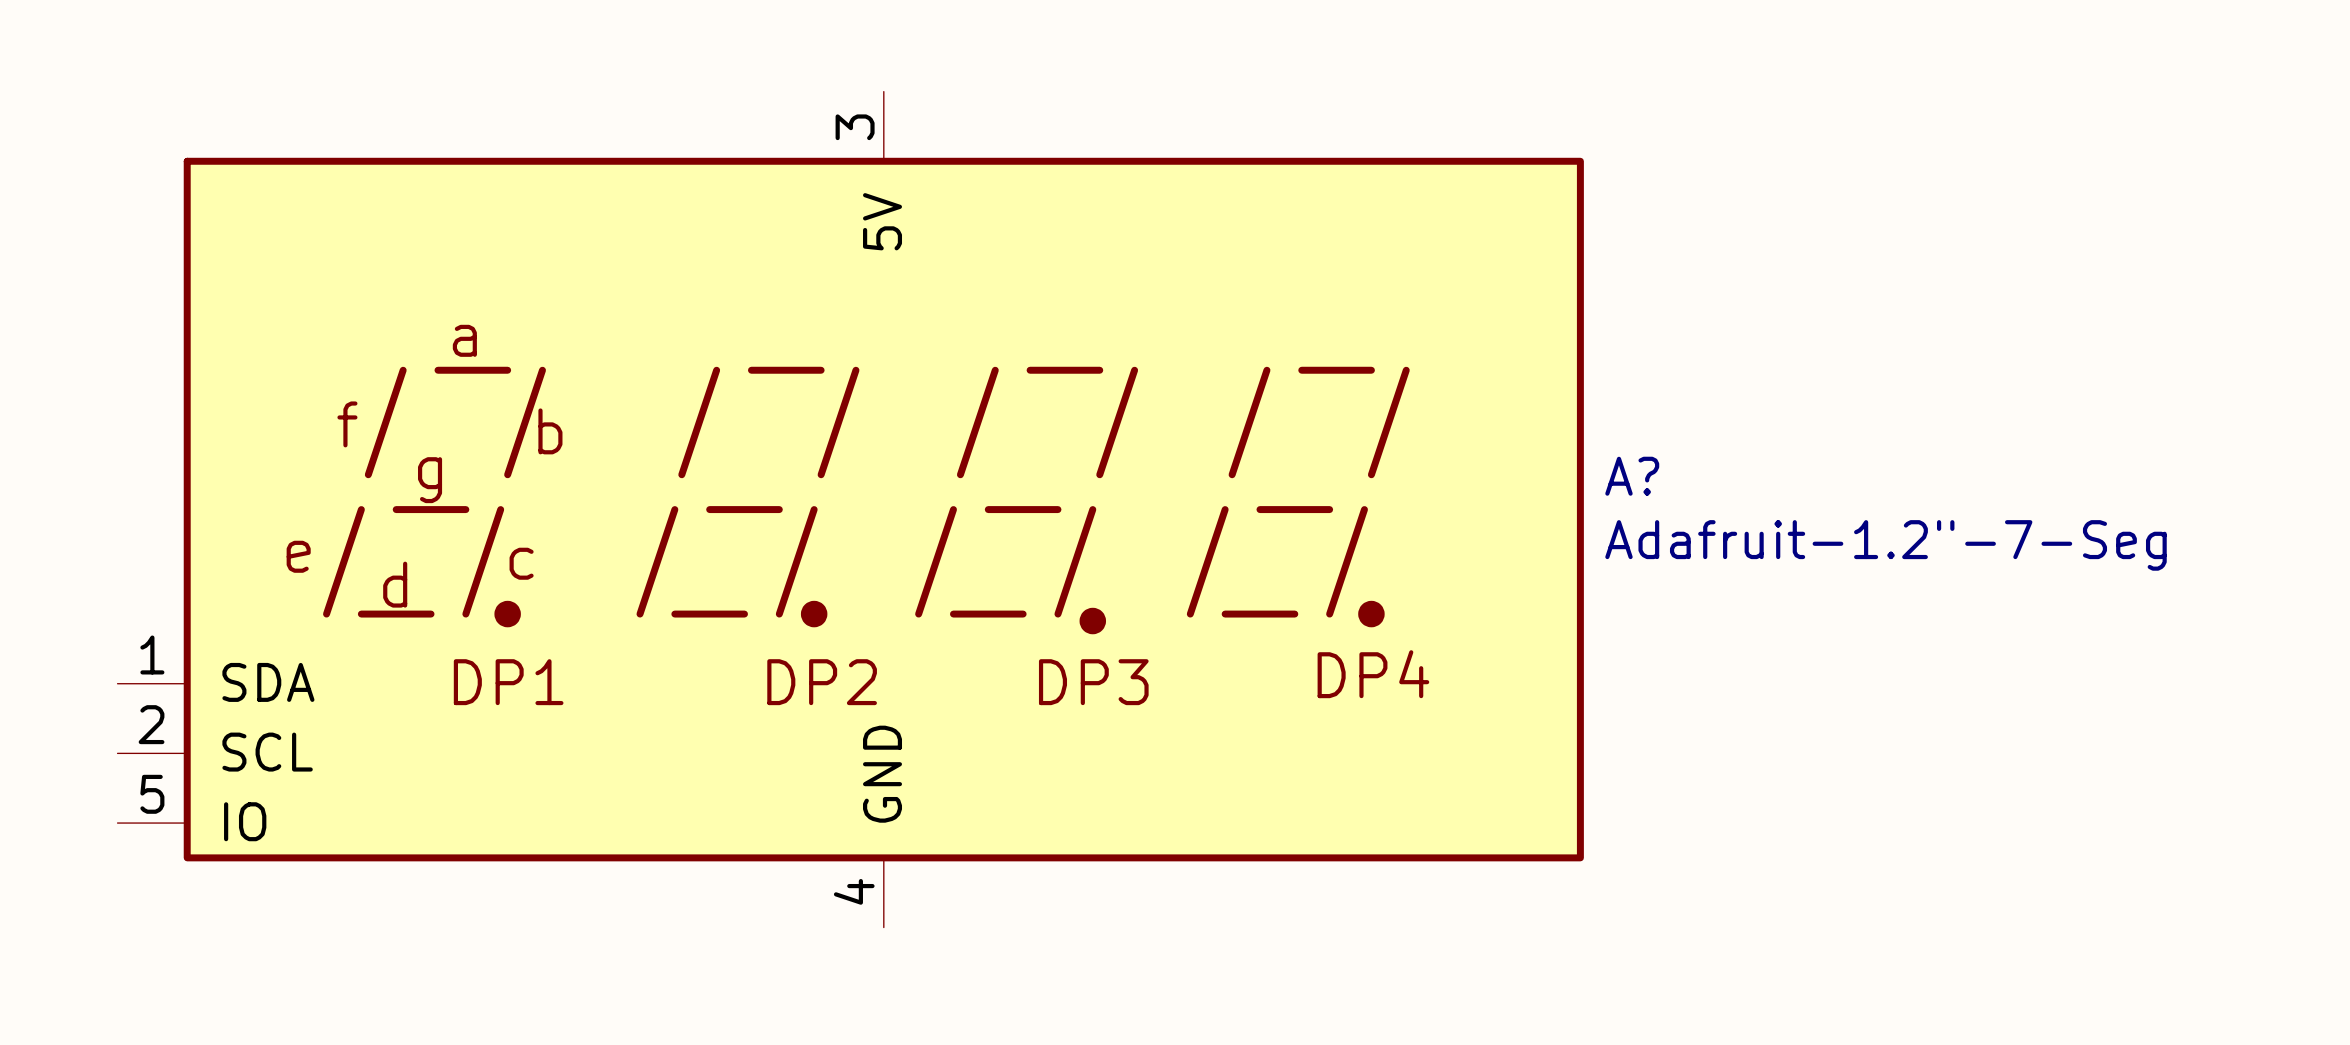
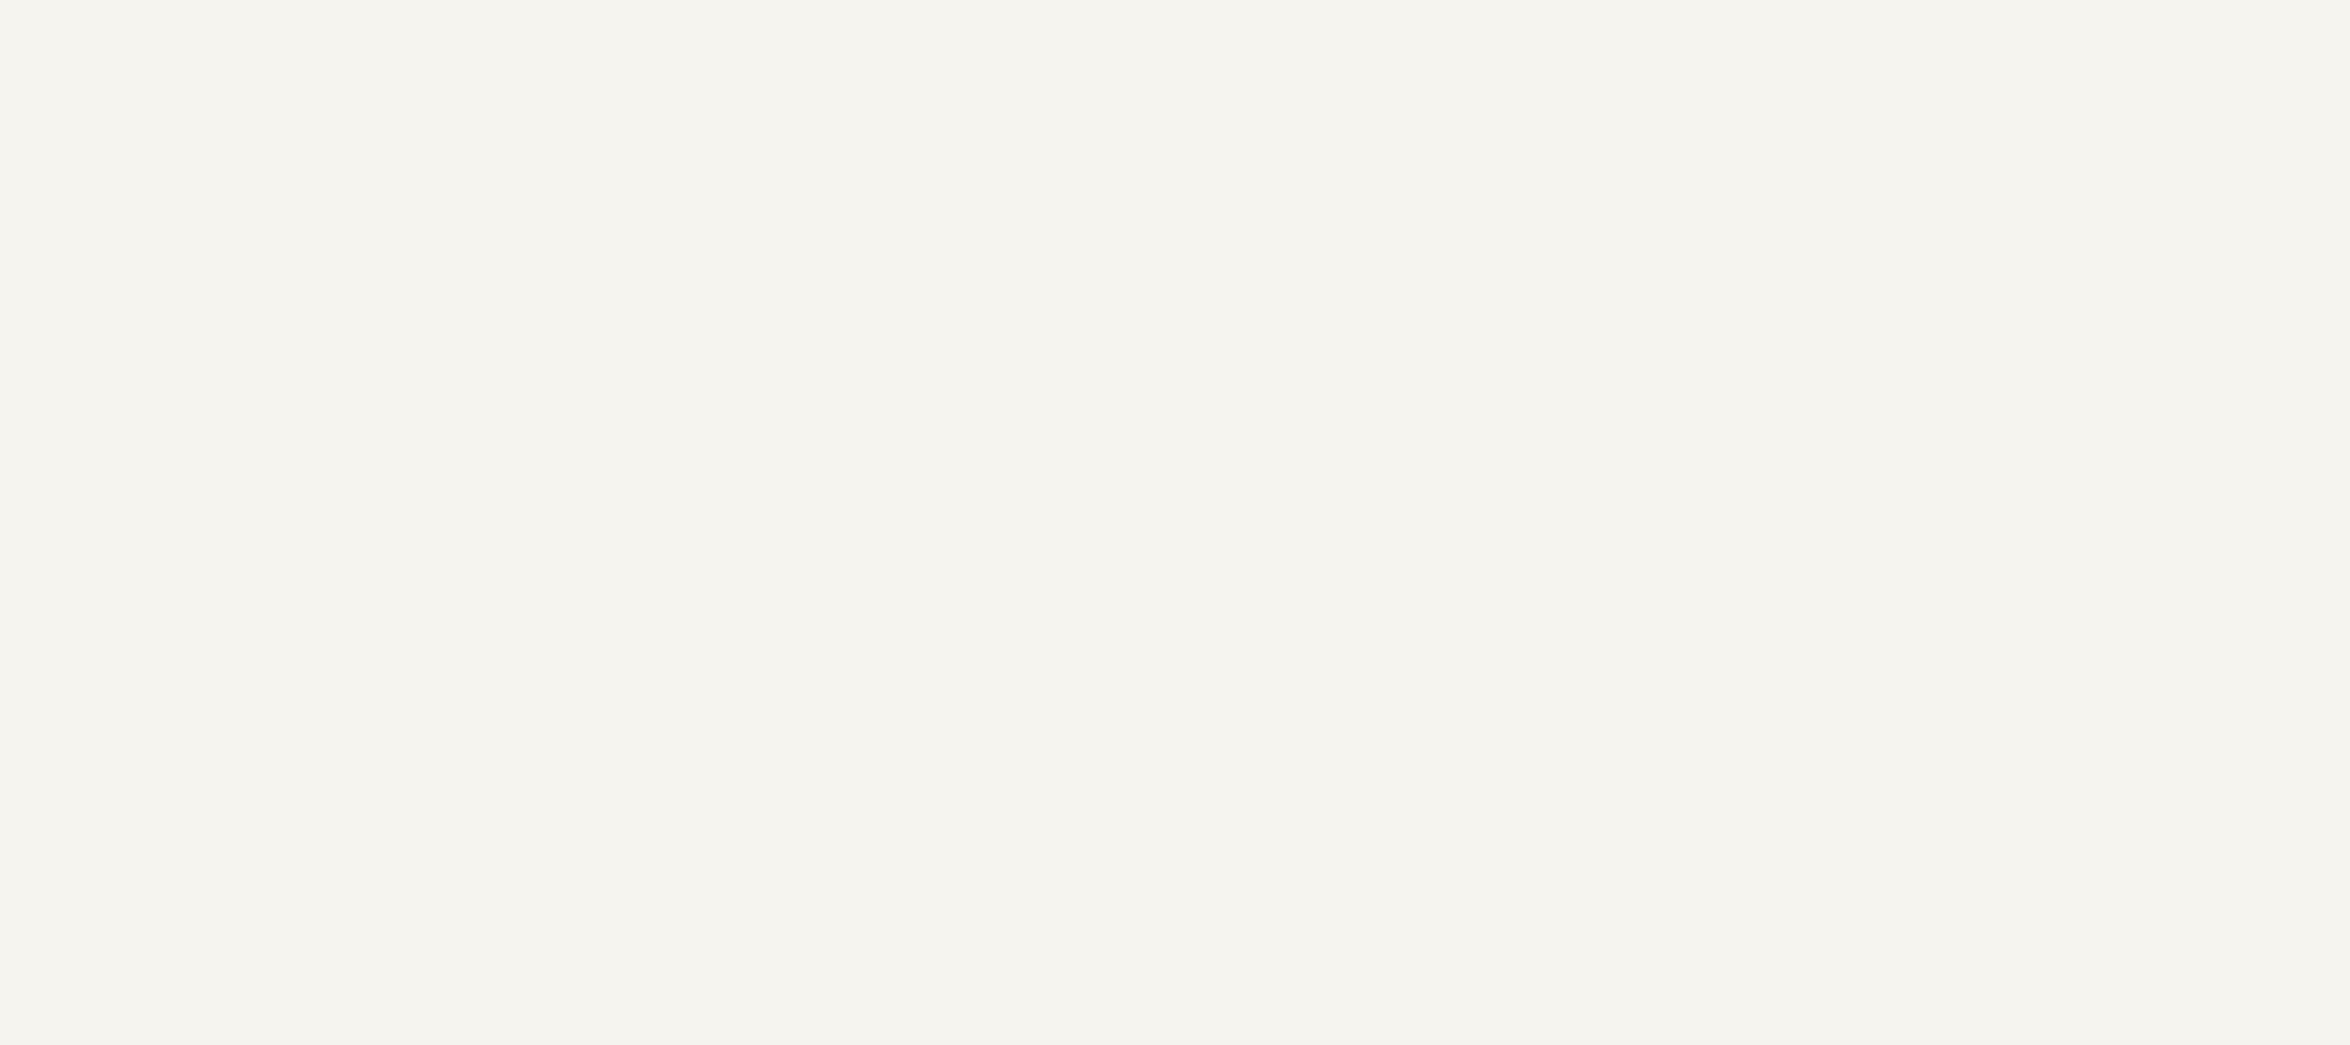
A?: Adafruit-1.2"-7-Seg (850, 509) -> none

